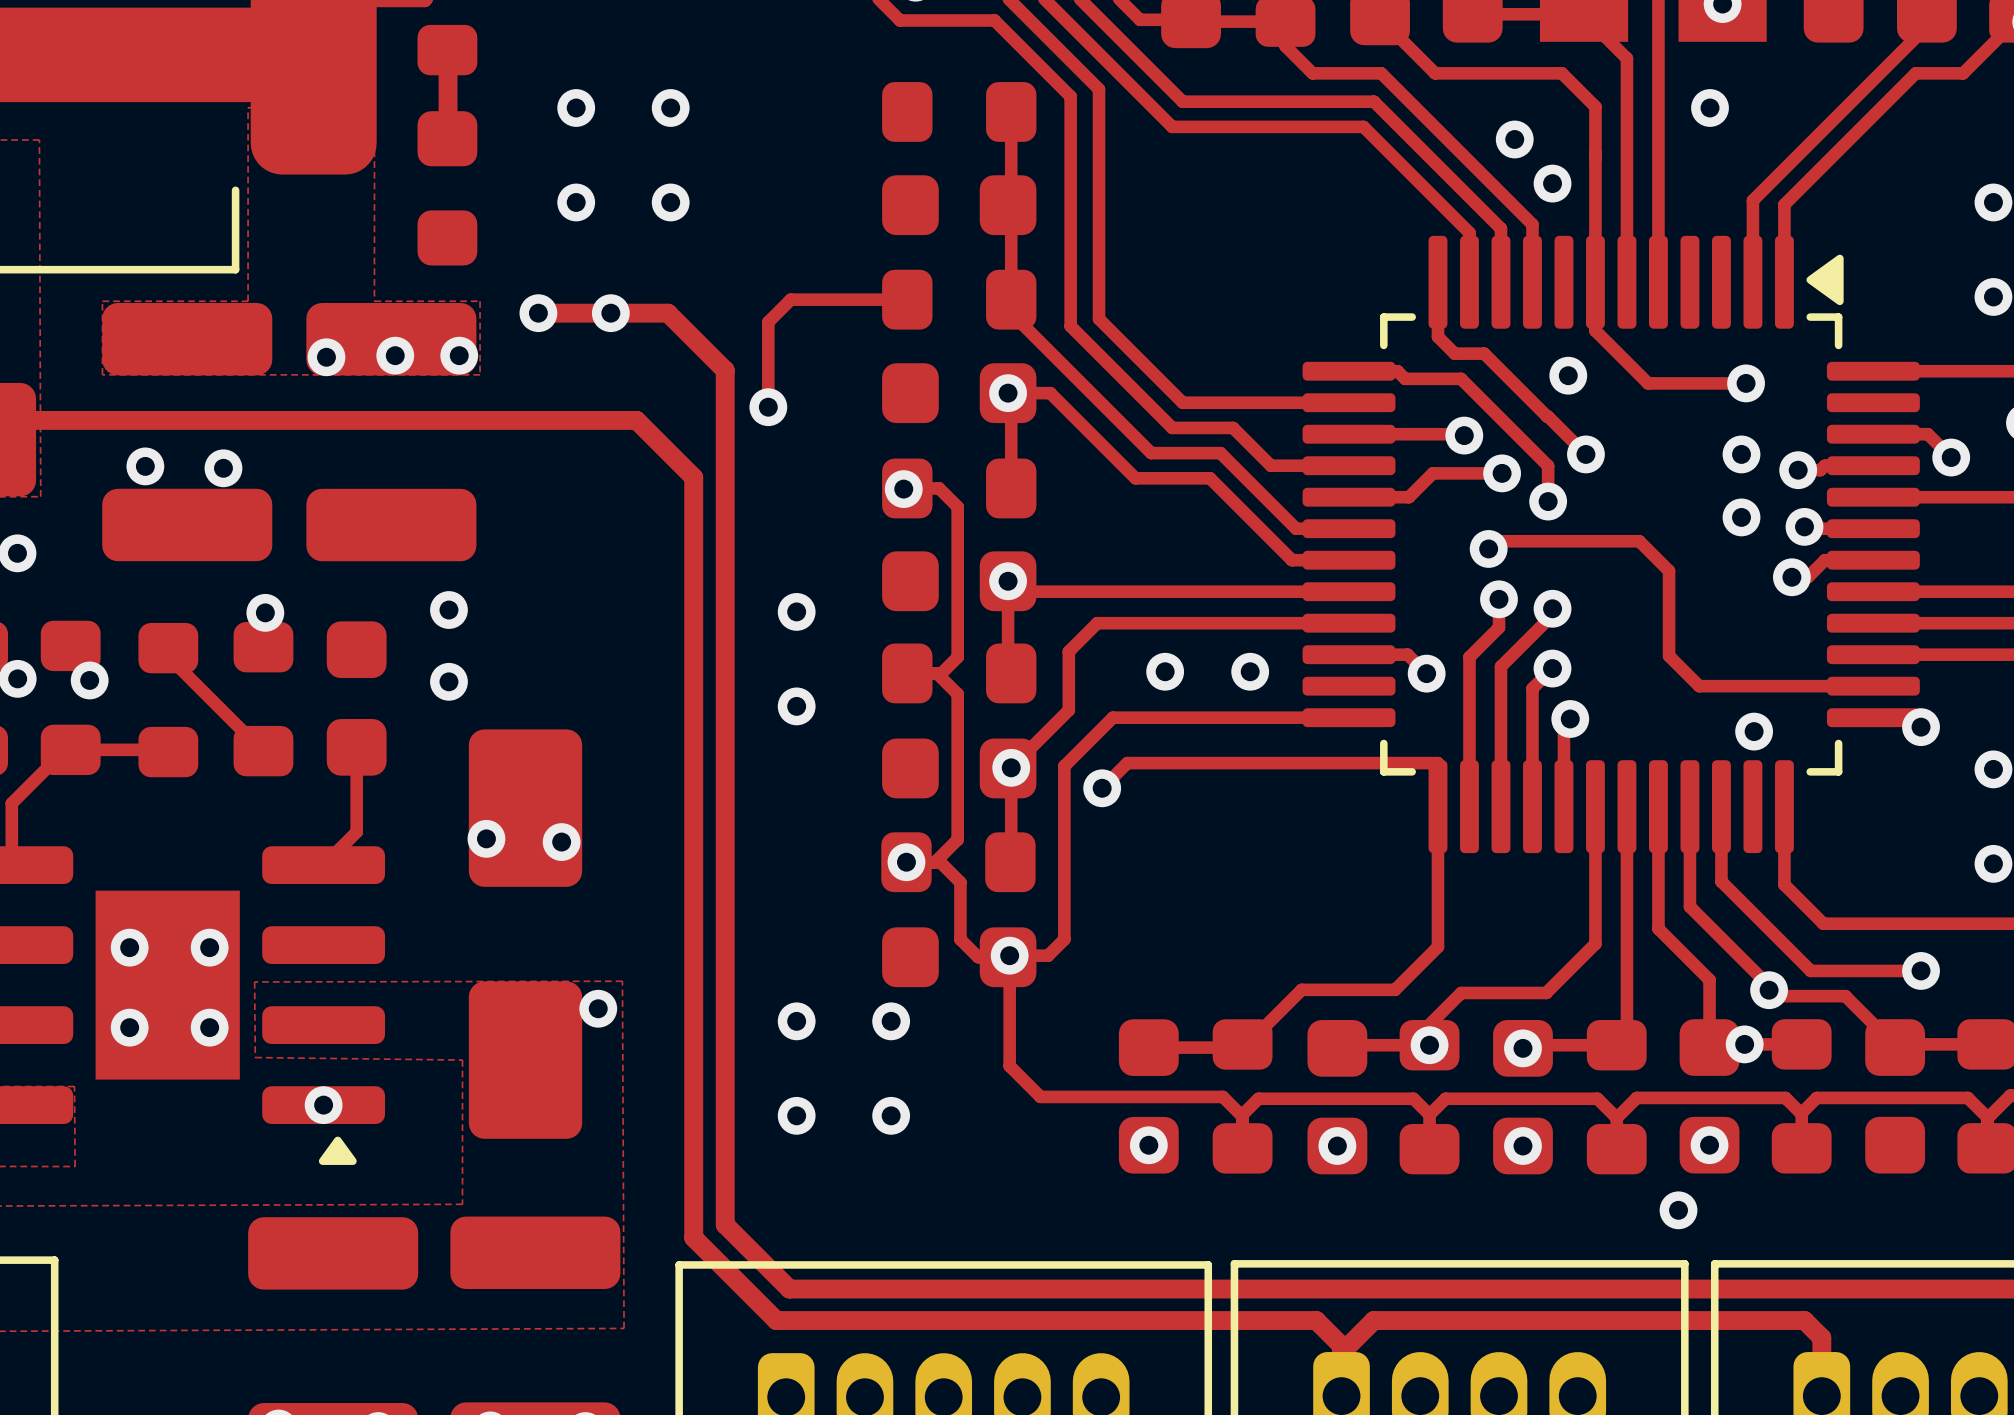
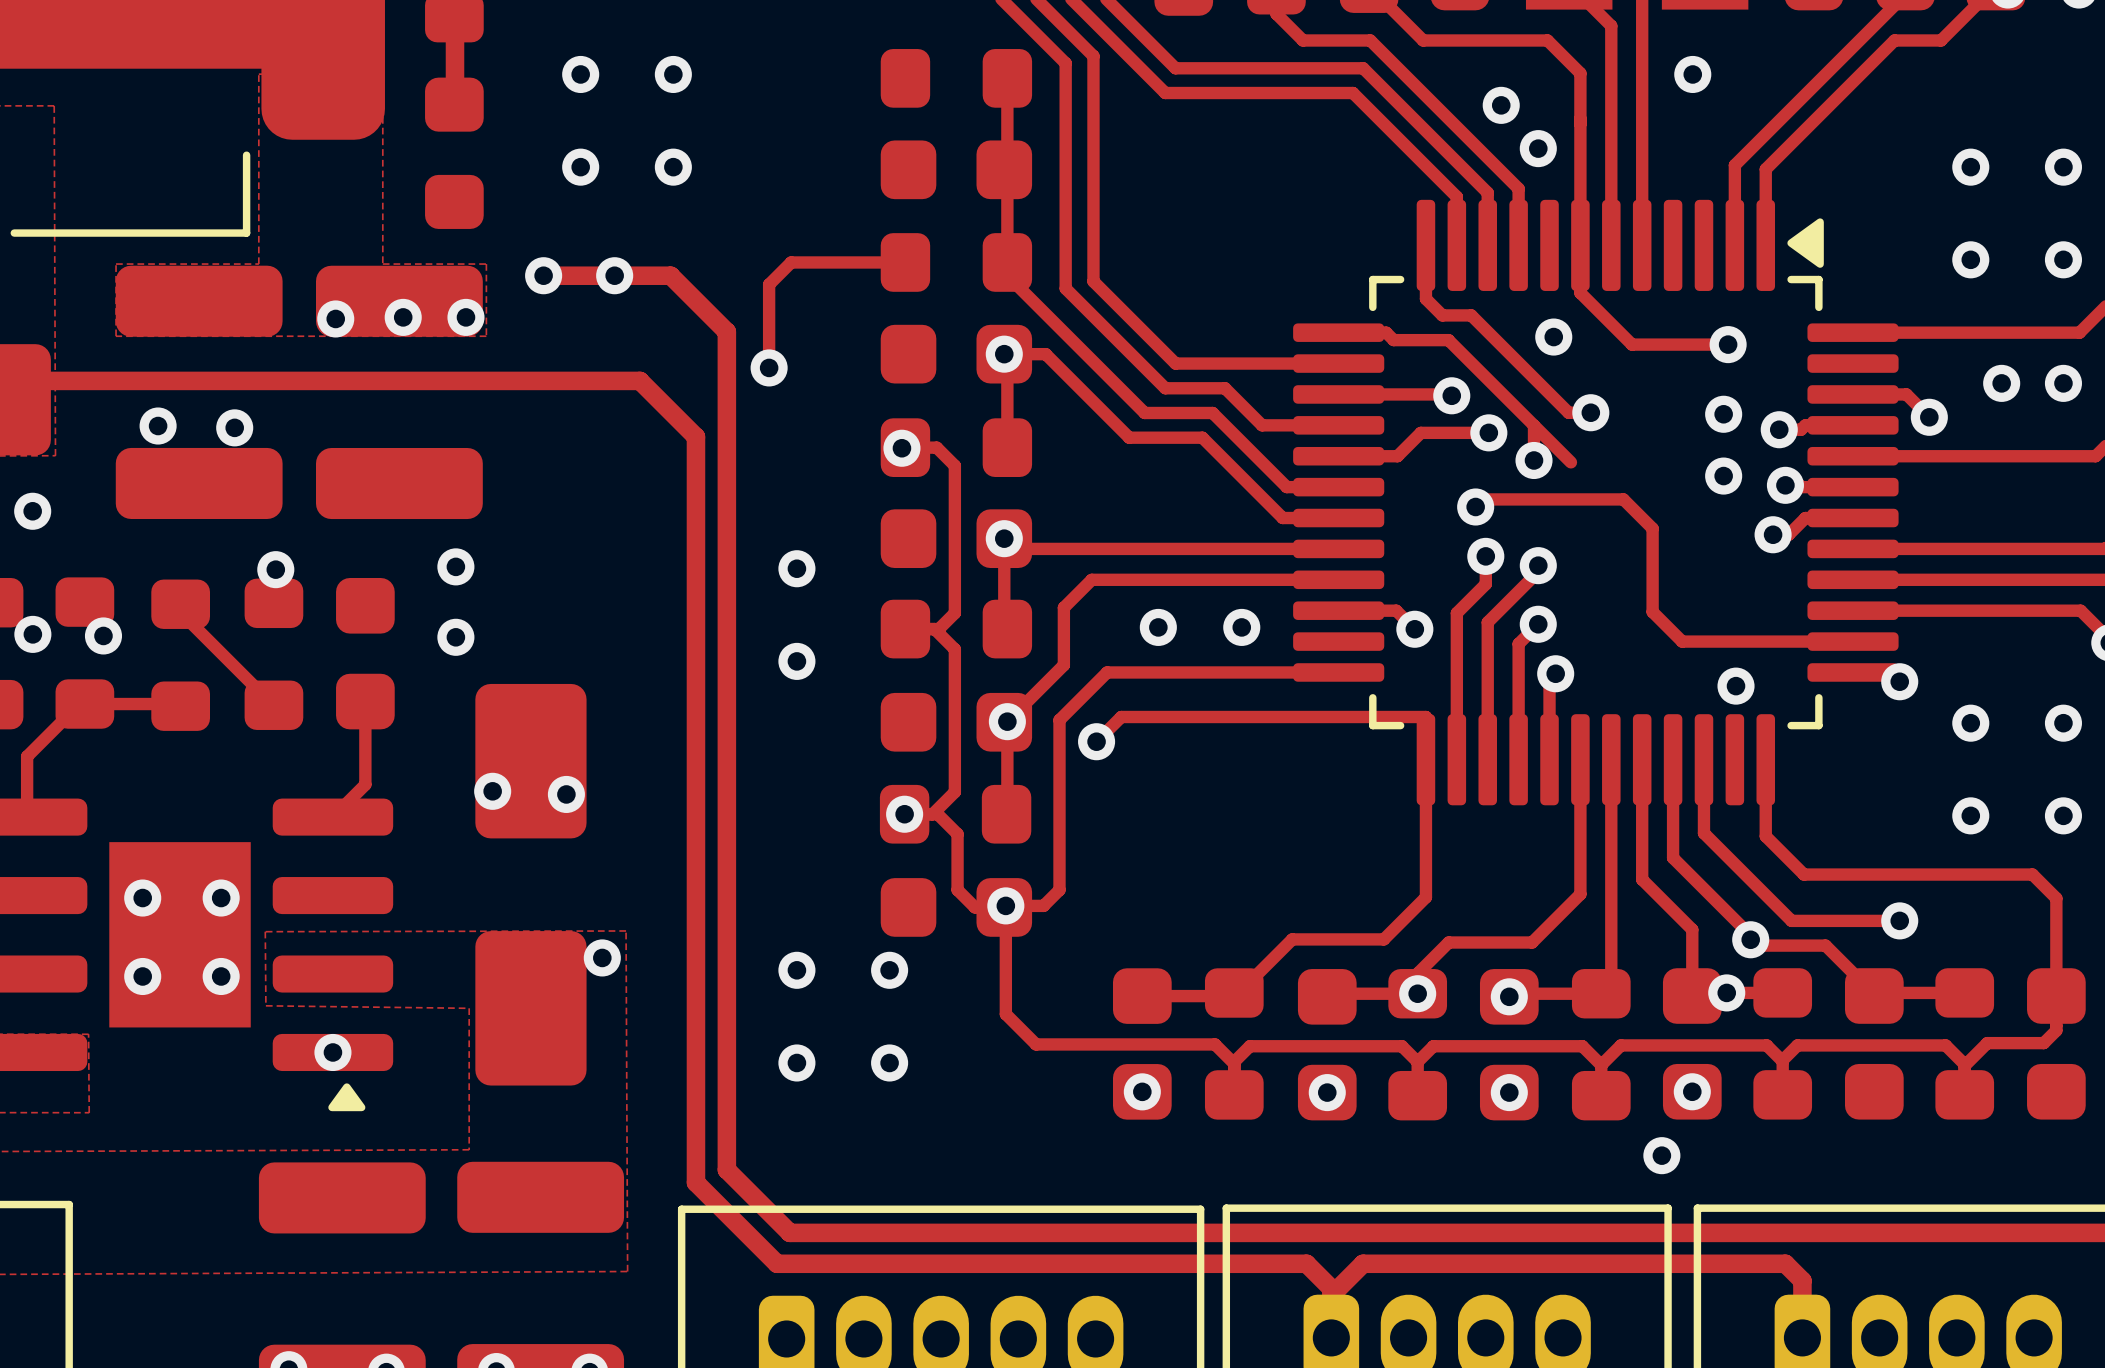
track: (1461, 378) (1548, 465) -> (1448, 340) (1570, 462)
track: (1548, 416) (1585, 454) -> (1533, 377) (1568, 412) (1590, 412)
via position: (1585, 454) -> (1590, 412)

